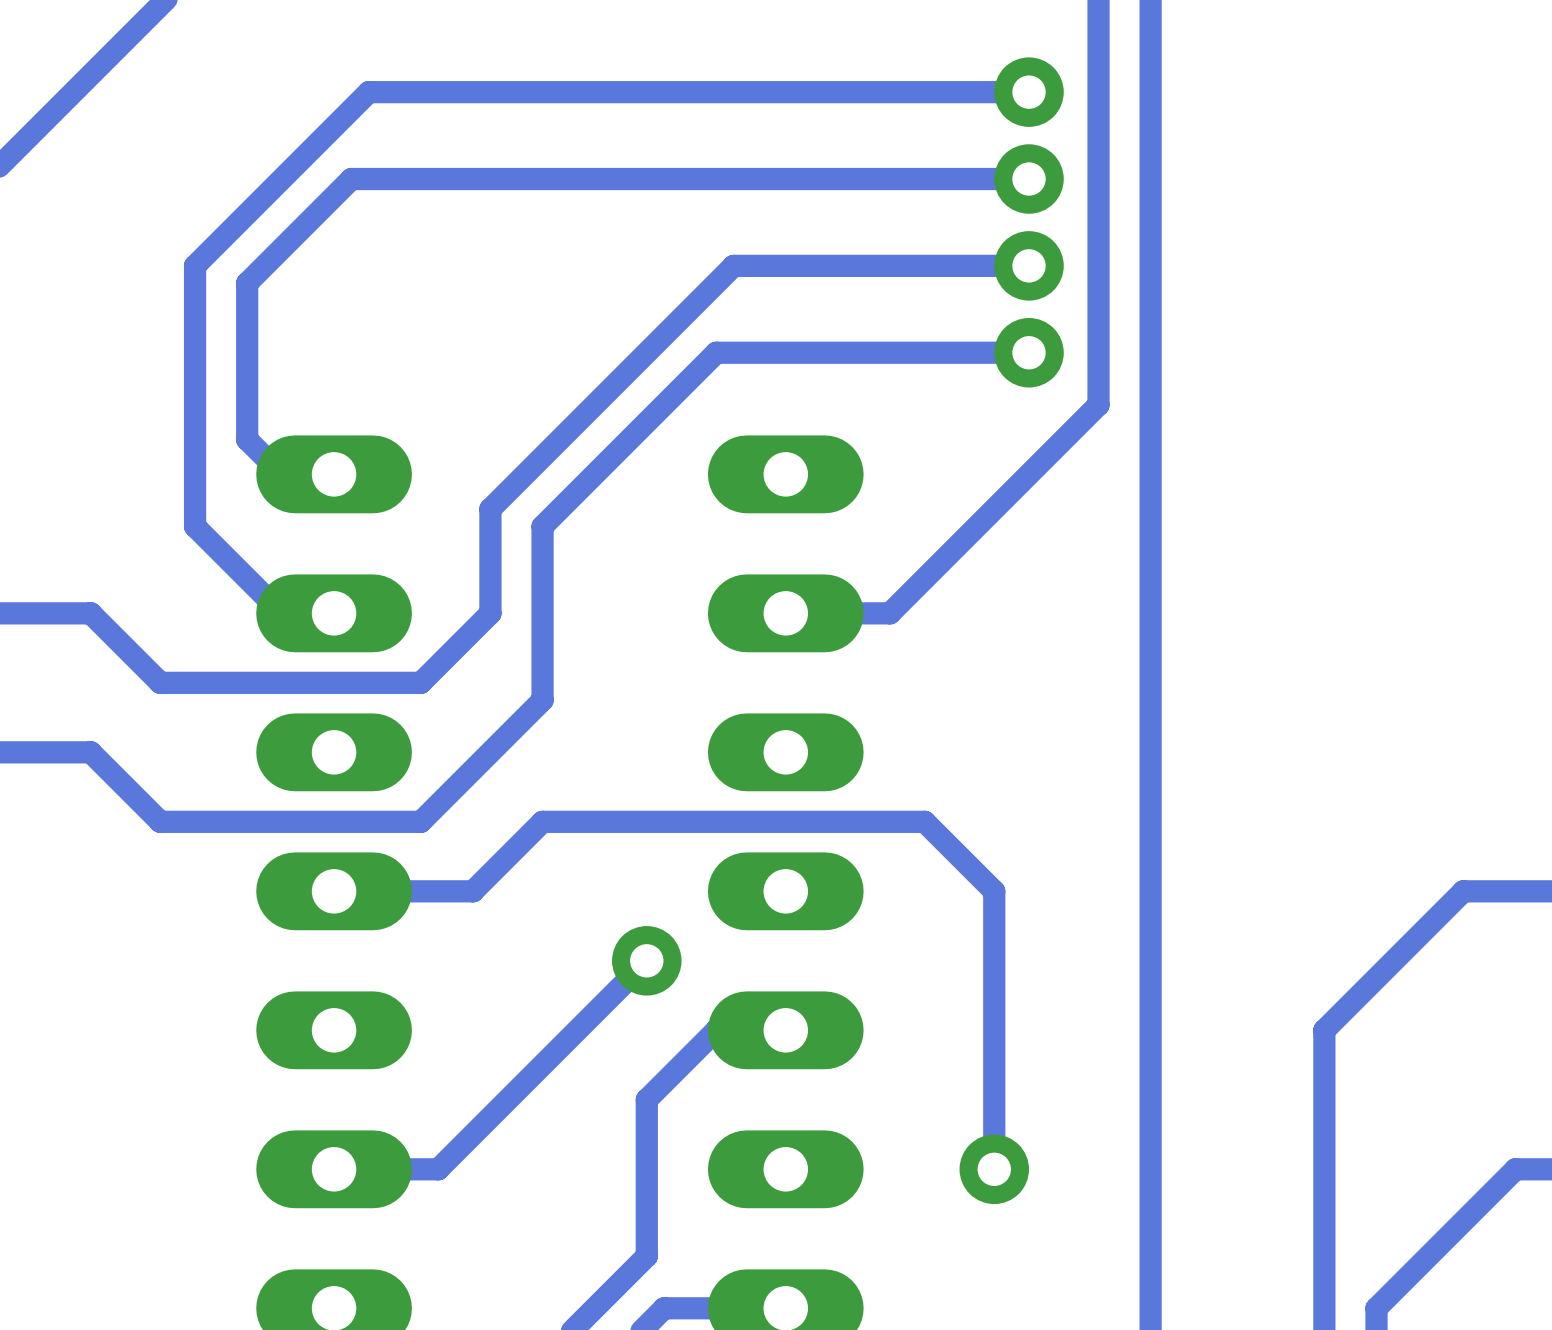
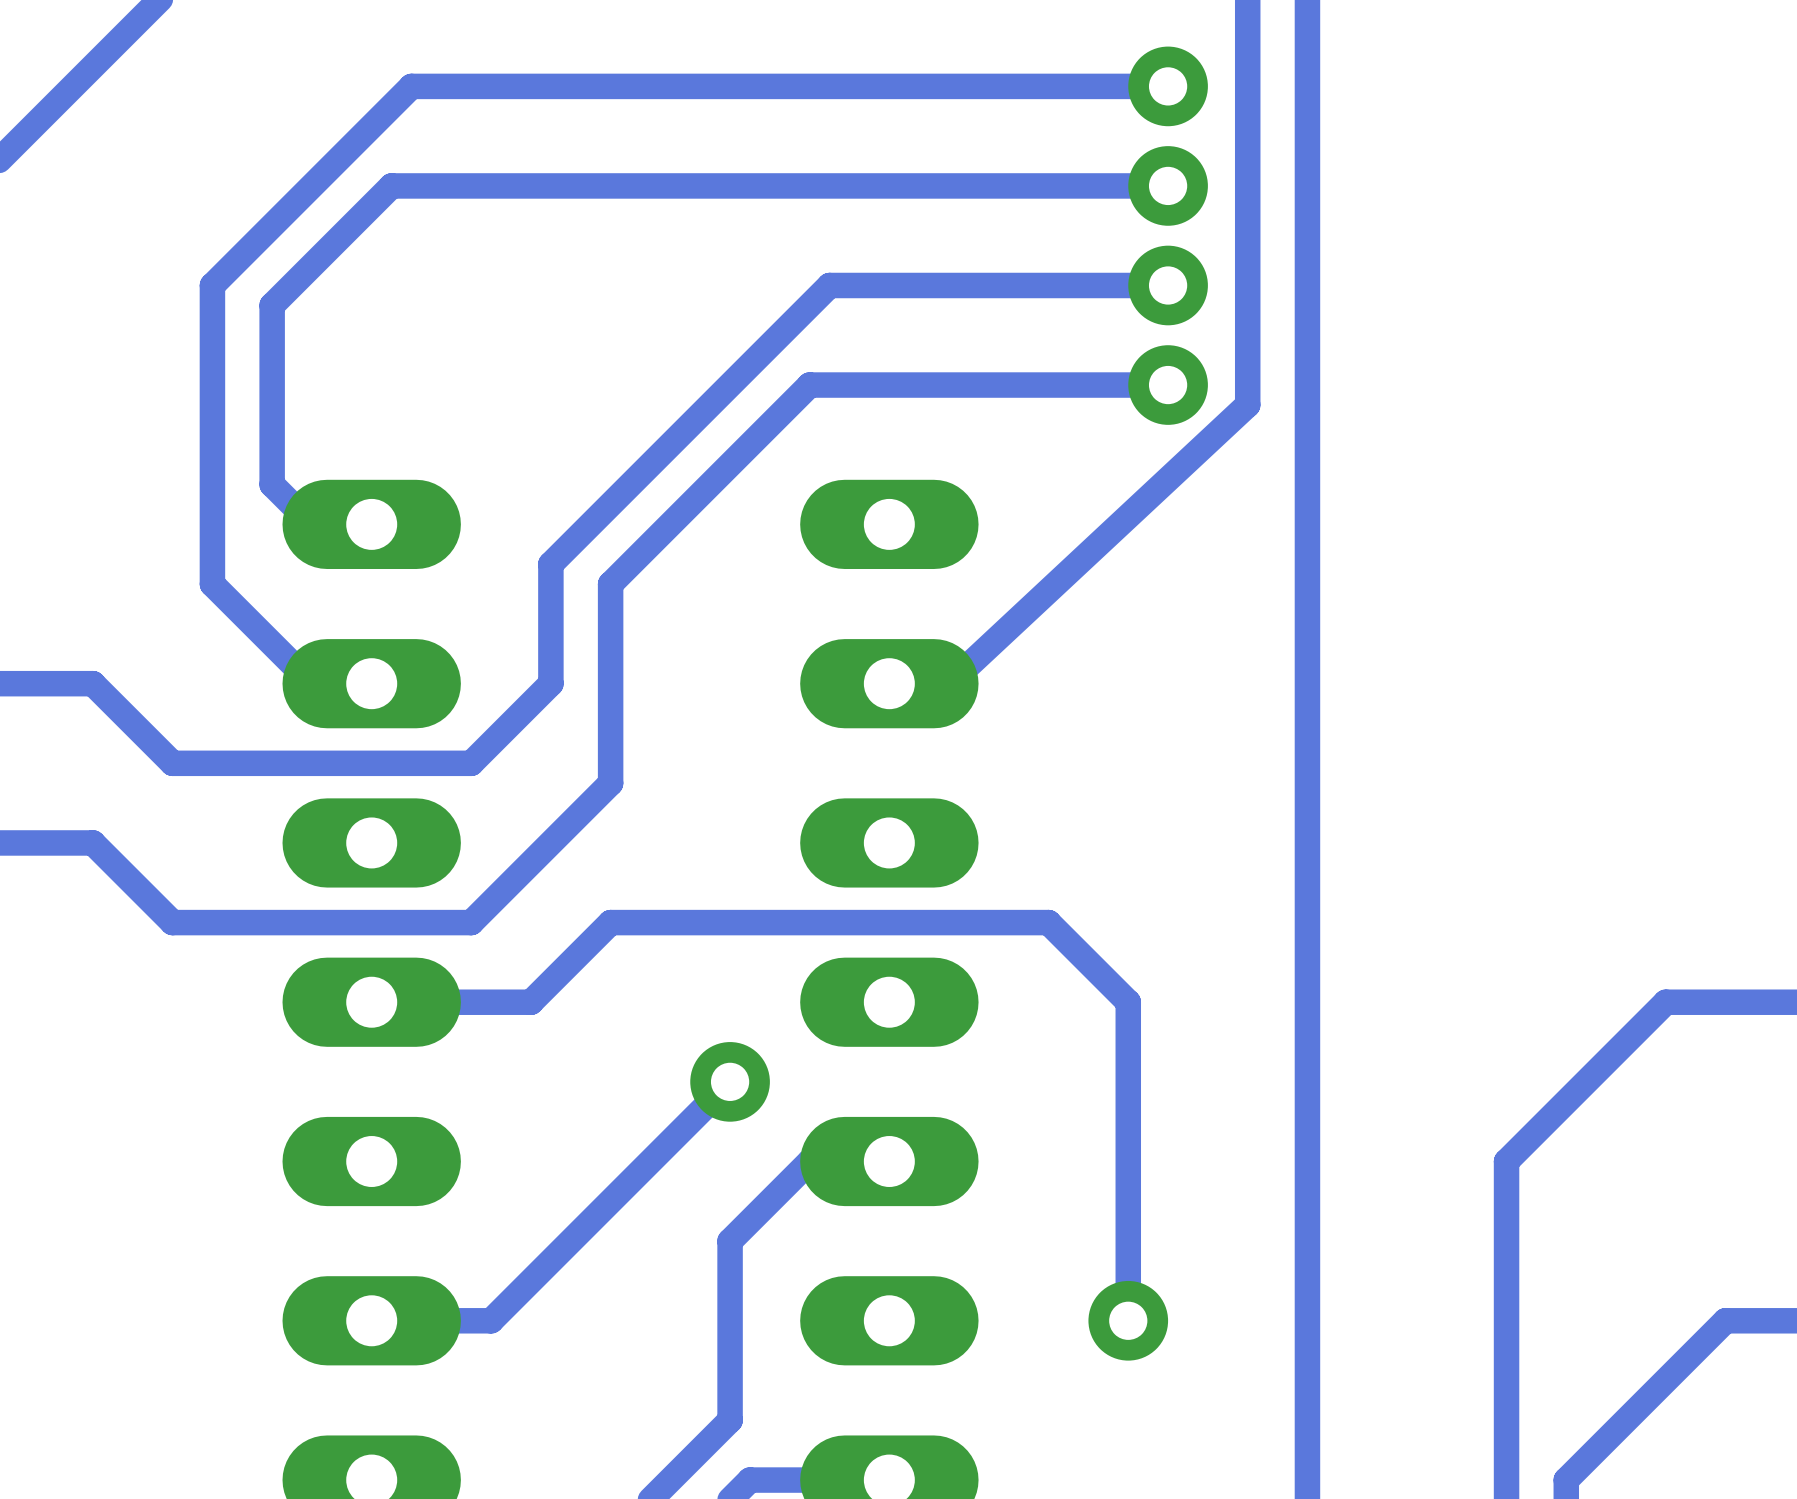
track: (1098, 370) (1098, 404) (890, 613) (837, 613) -> (1247, 404) (949, 683)

